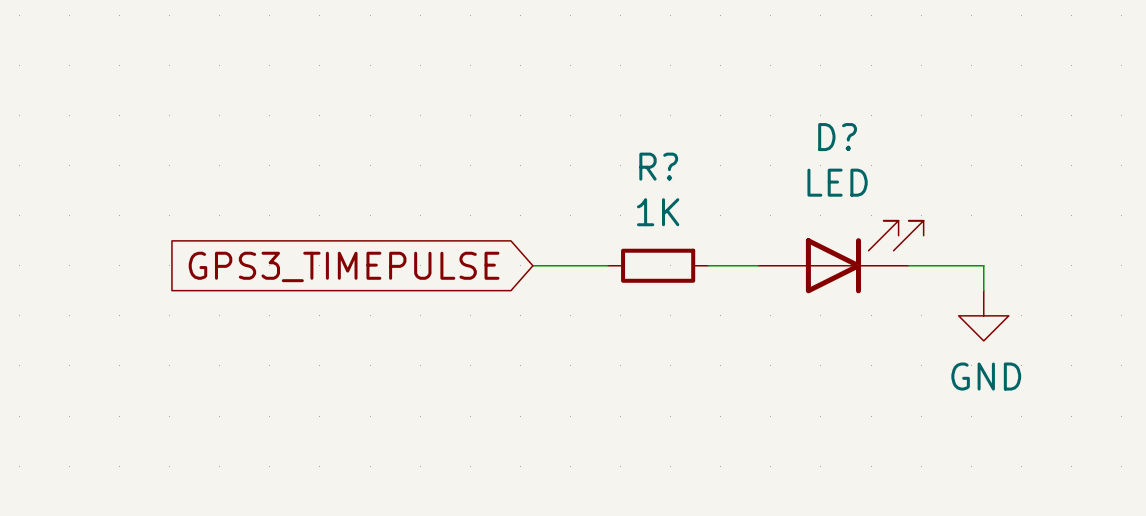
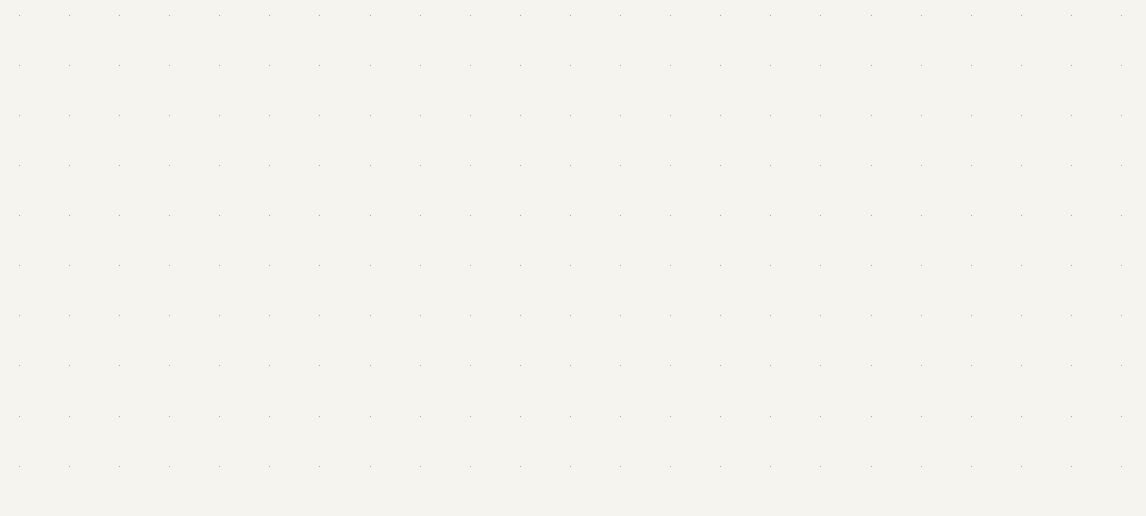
D?: LED (840, 256) -> none
wire: (532, 265) (608, 265) -> none
R?: 1K (658, 265) -> none
wire: (708, 265) (758, 265) -> none
wire: (908, 265) (983, 265) (983, 290) -> none
global label: GPS3_TIMEPULSE (344, 266) -> none
power symbol: GND (983, 315) -> none

